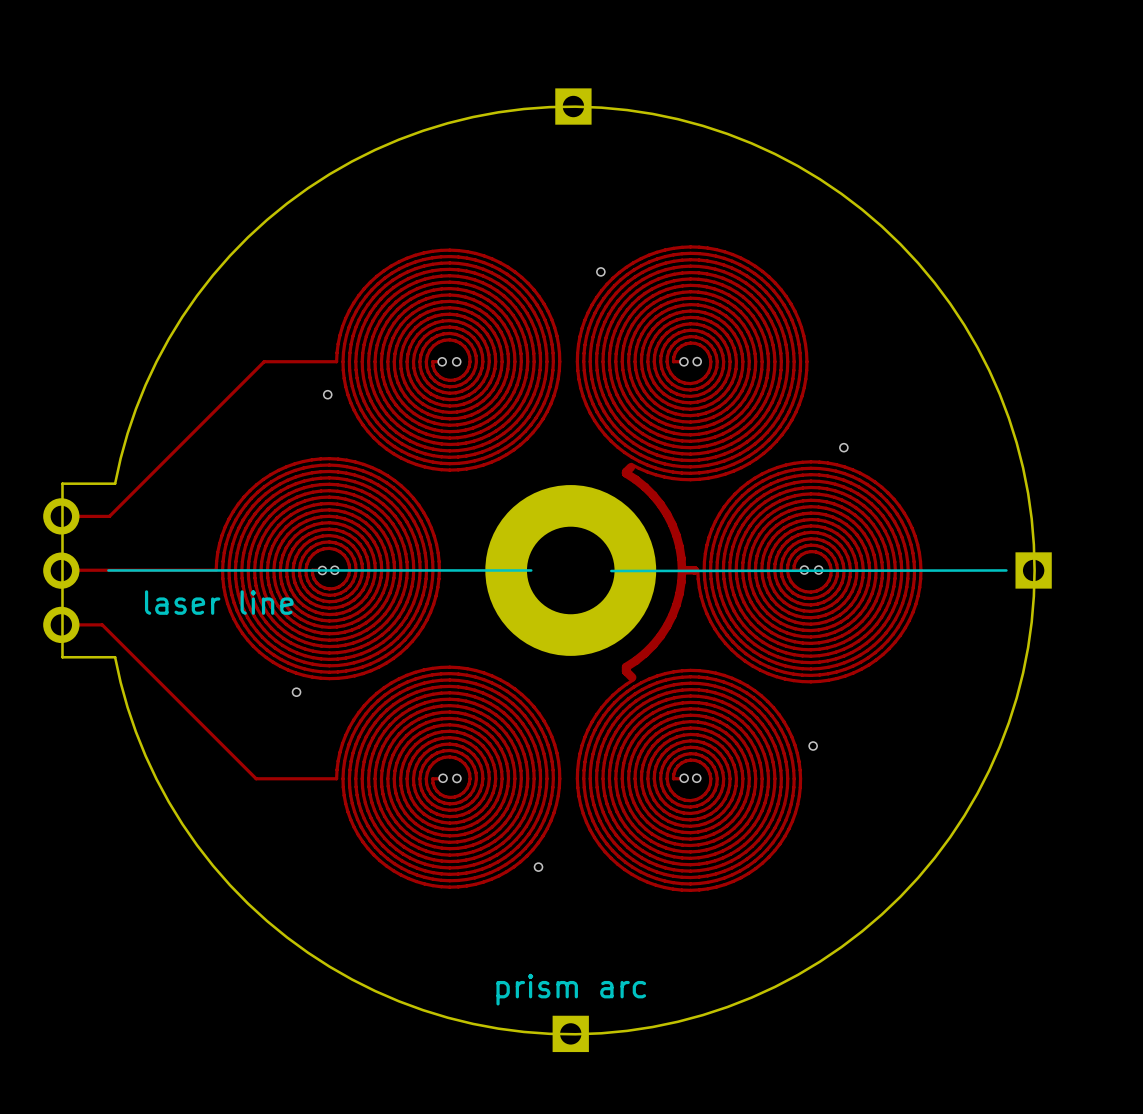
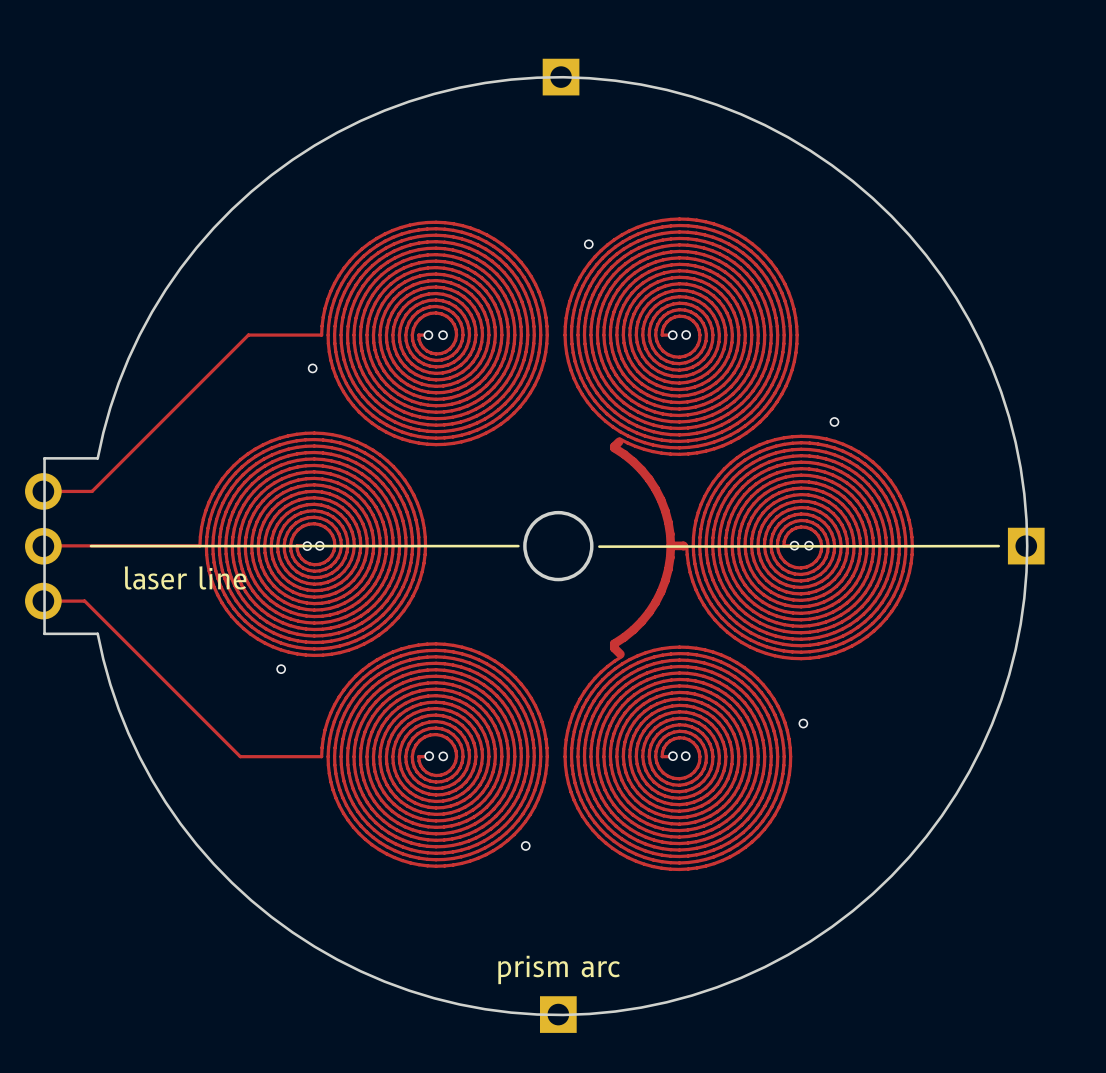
round board edge: none -> [523, 510, 594, 582]
part: (570, 570) -> none

